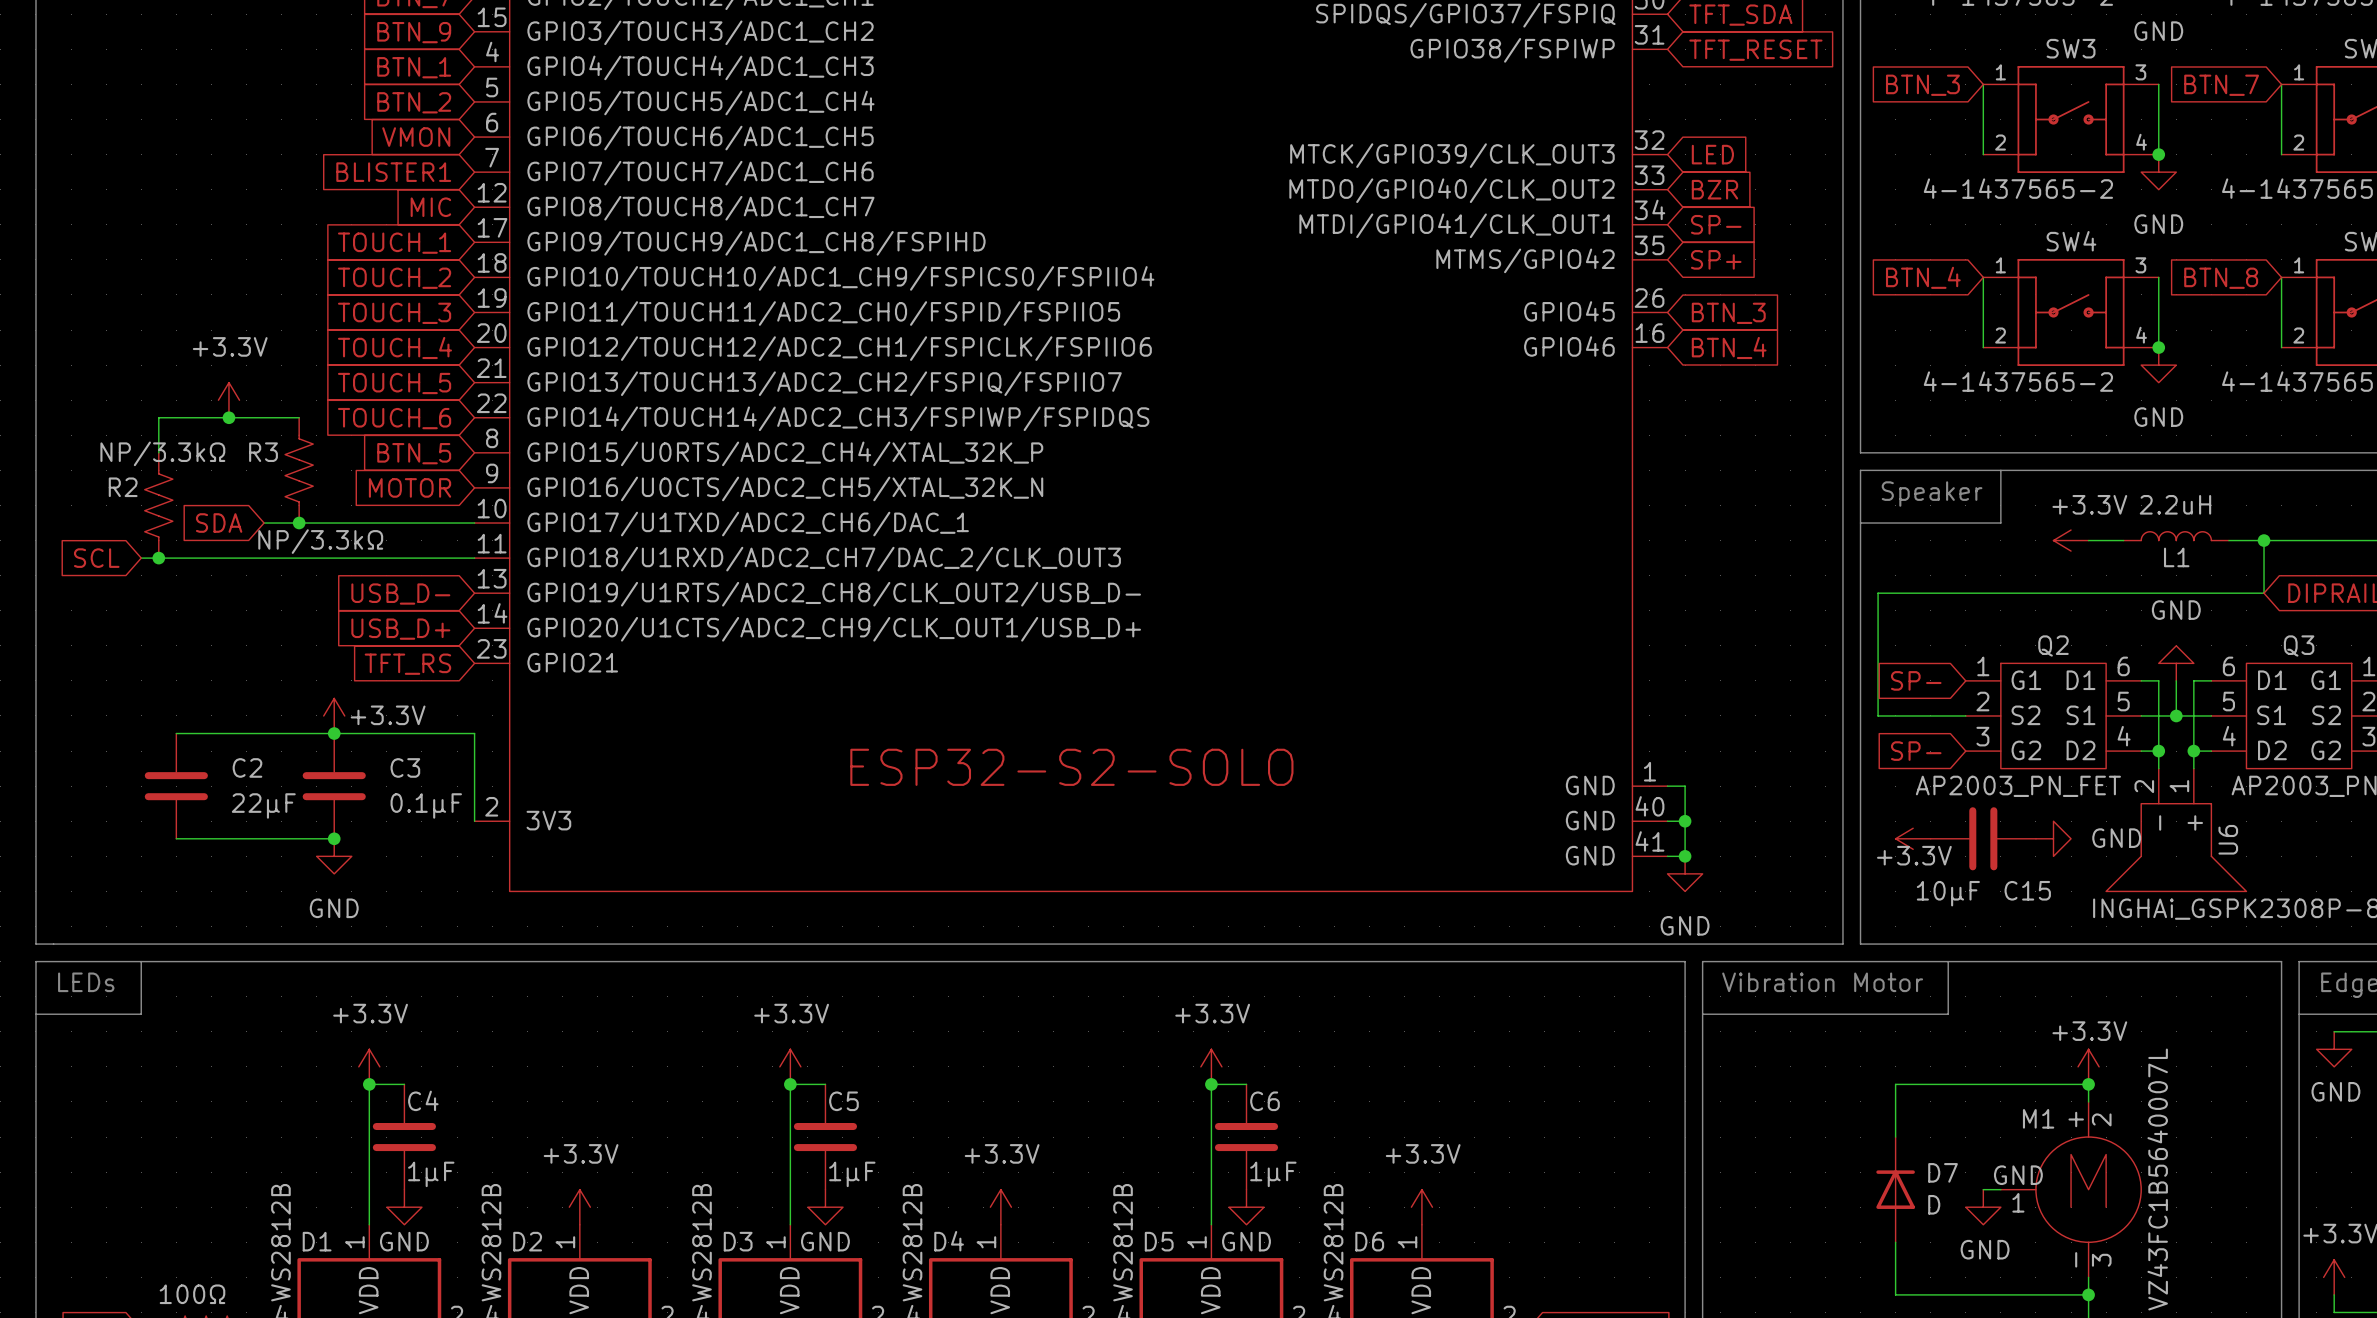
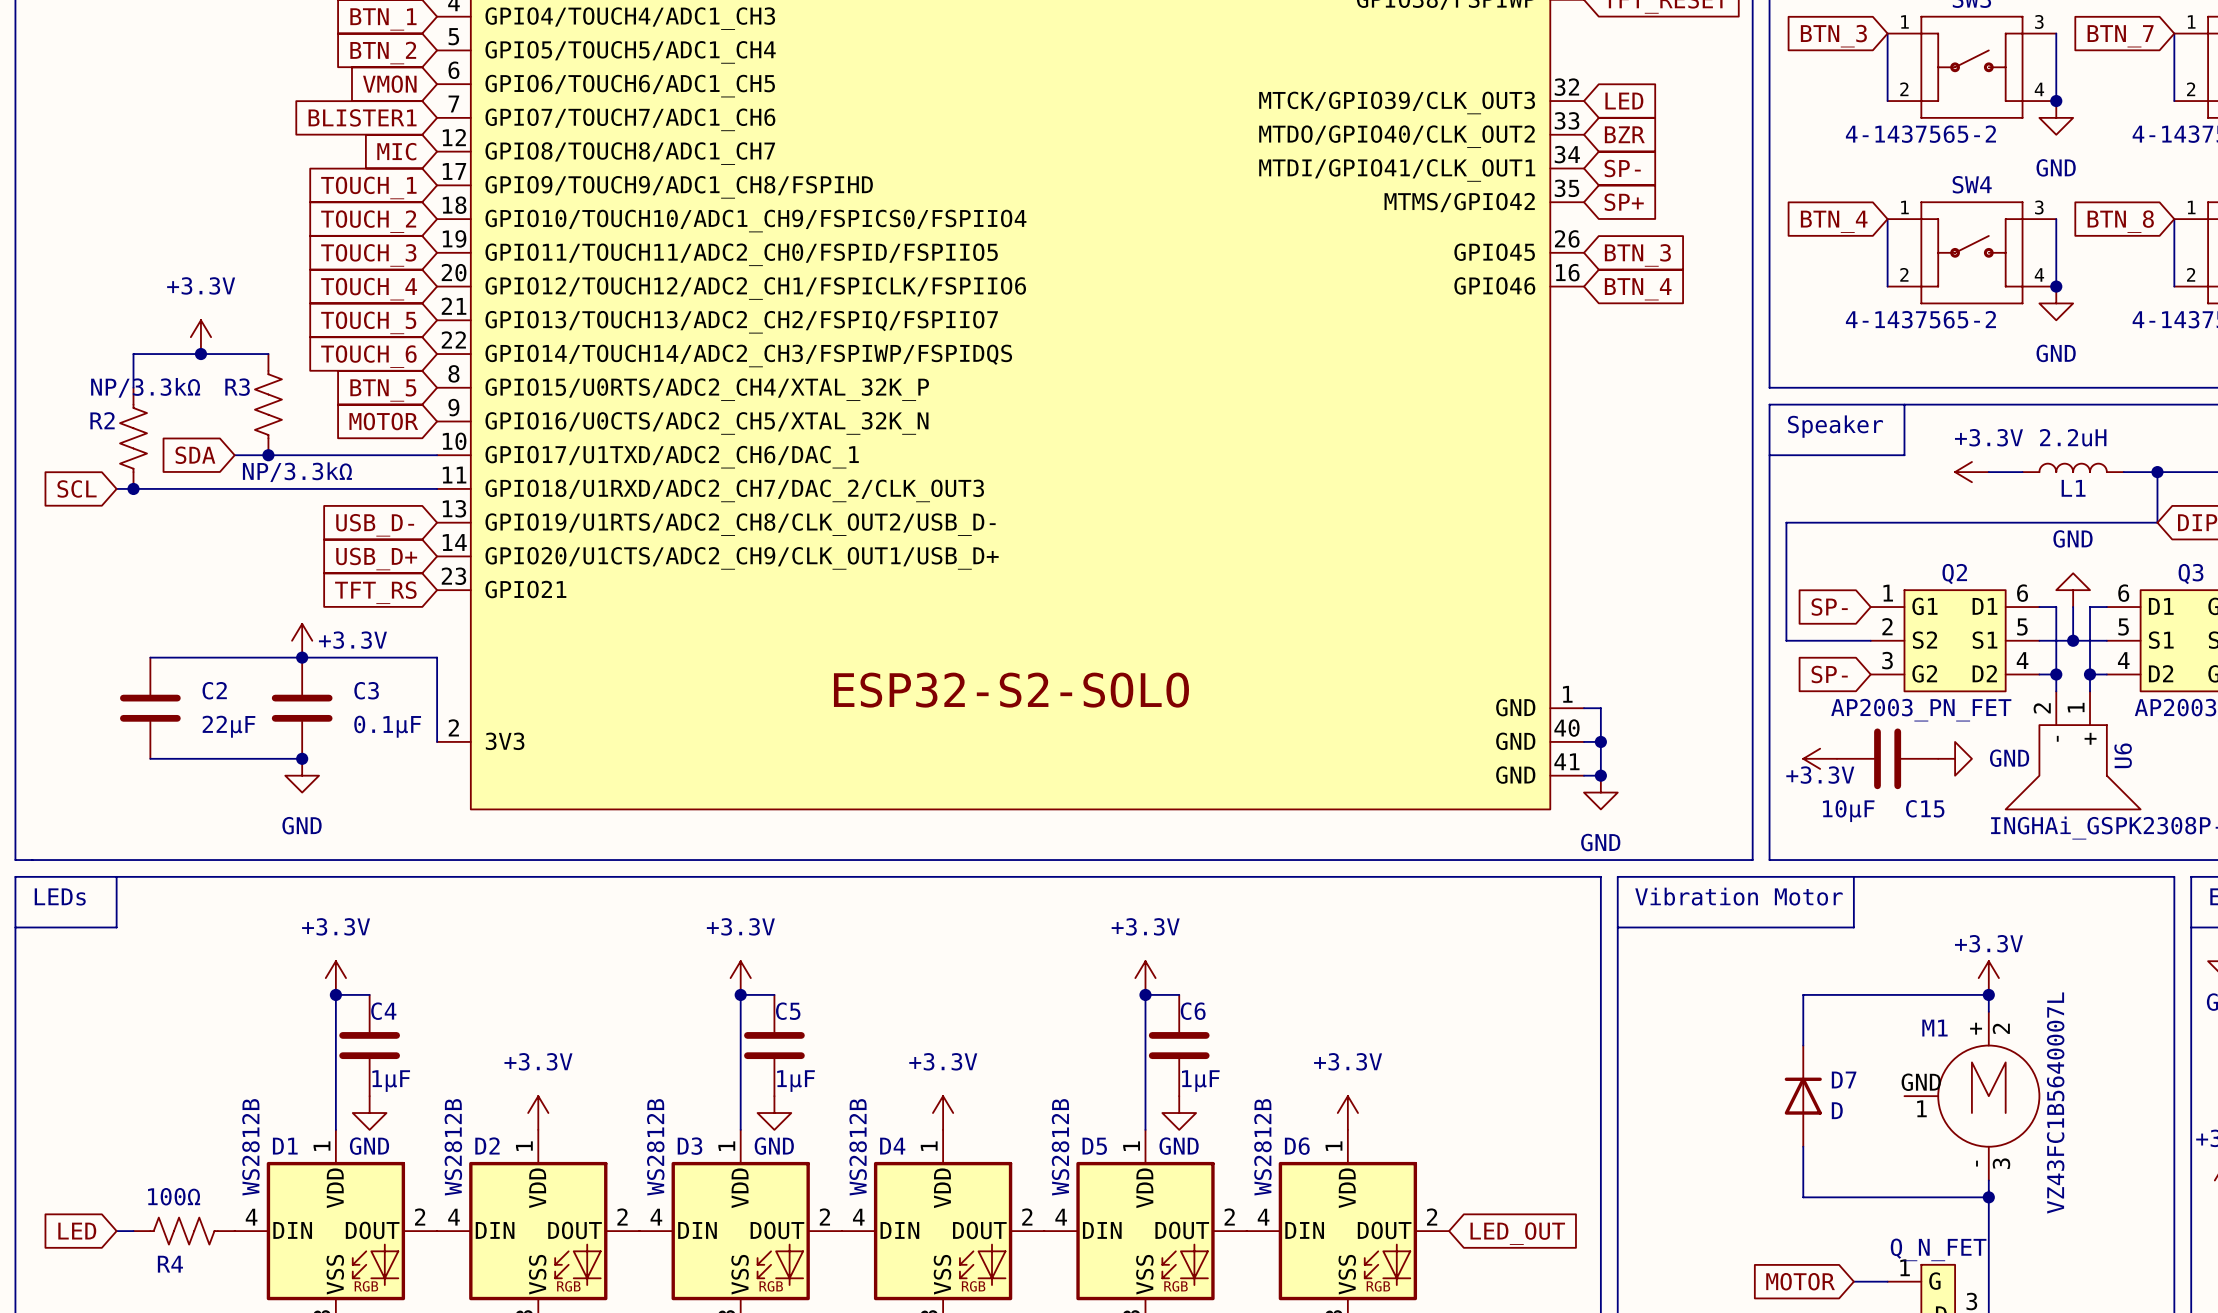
wire: (1983, 1189) (2000, 1189) -> none
power symbol: GND (1983, 1207) -> none

